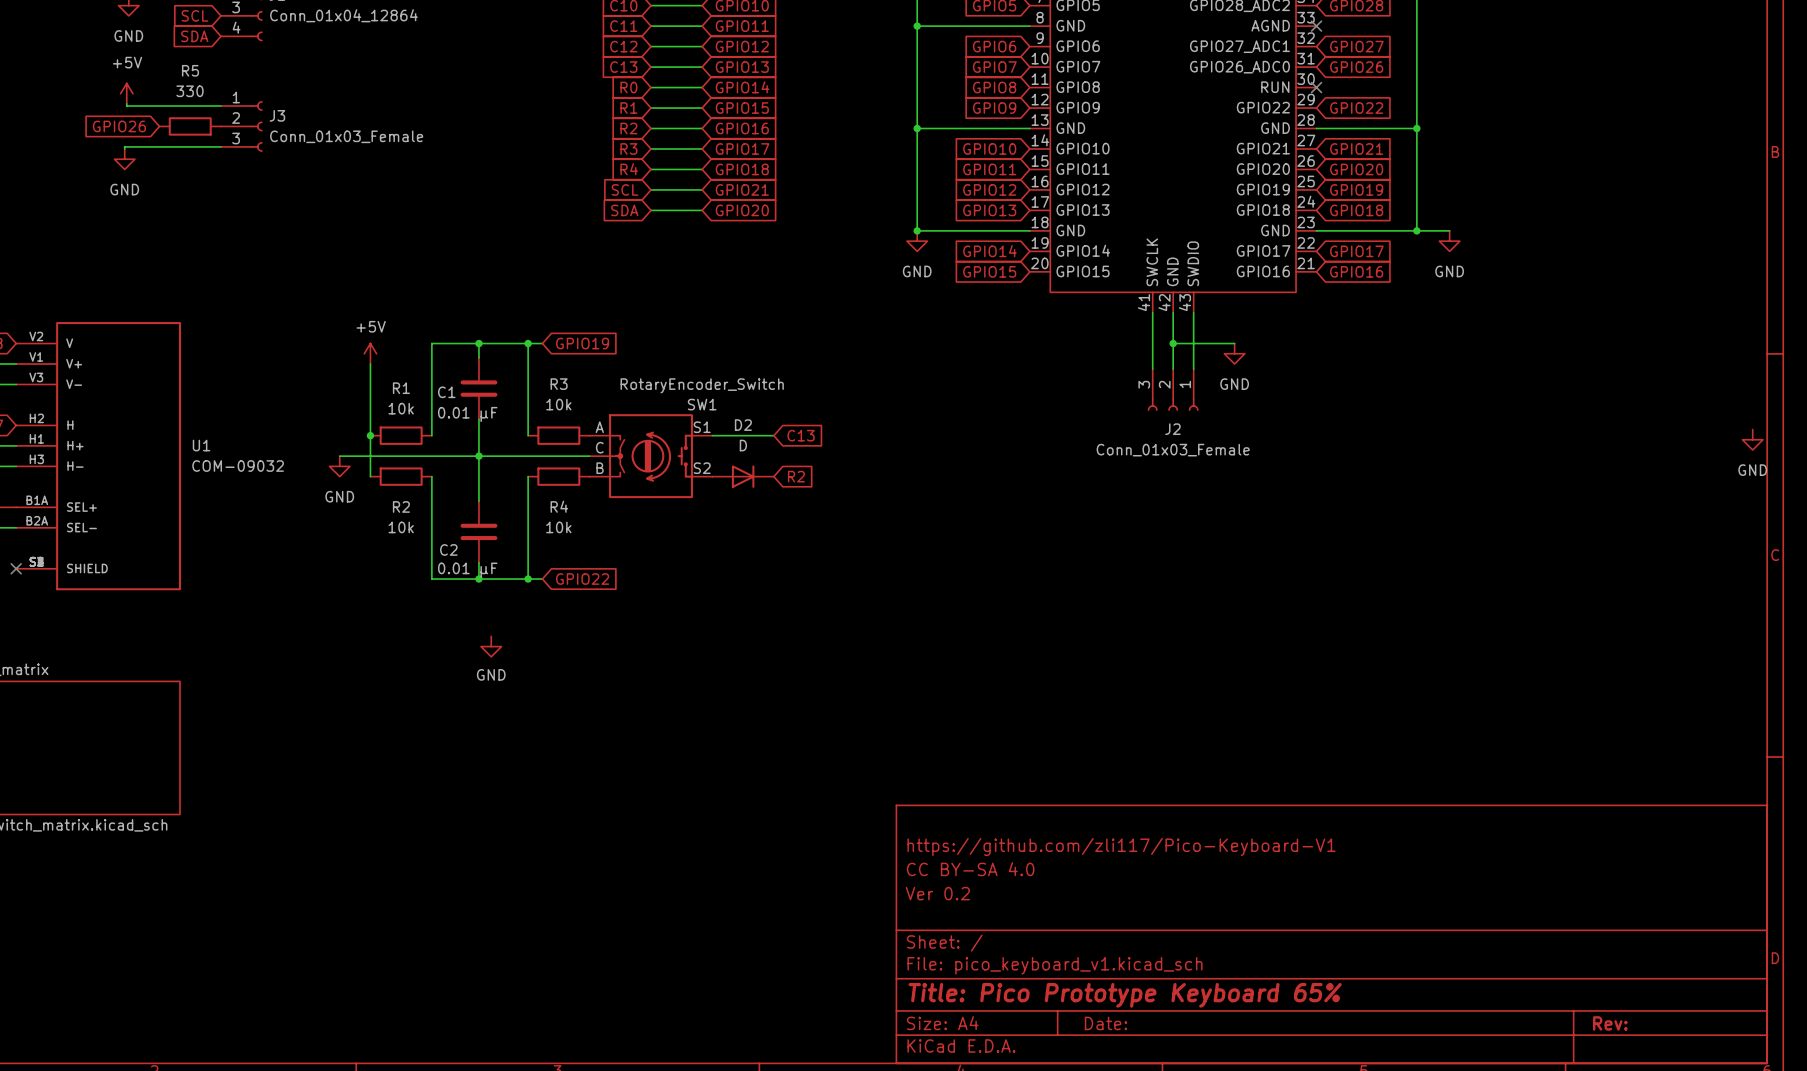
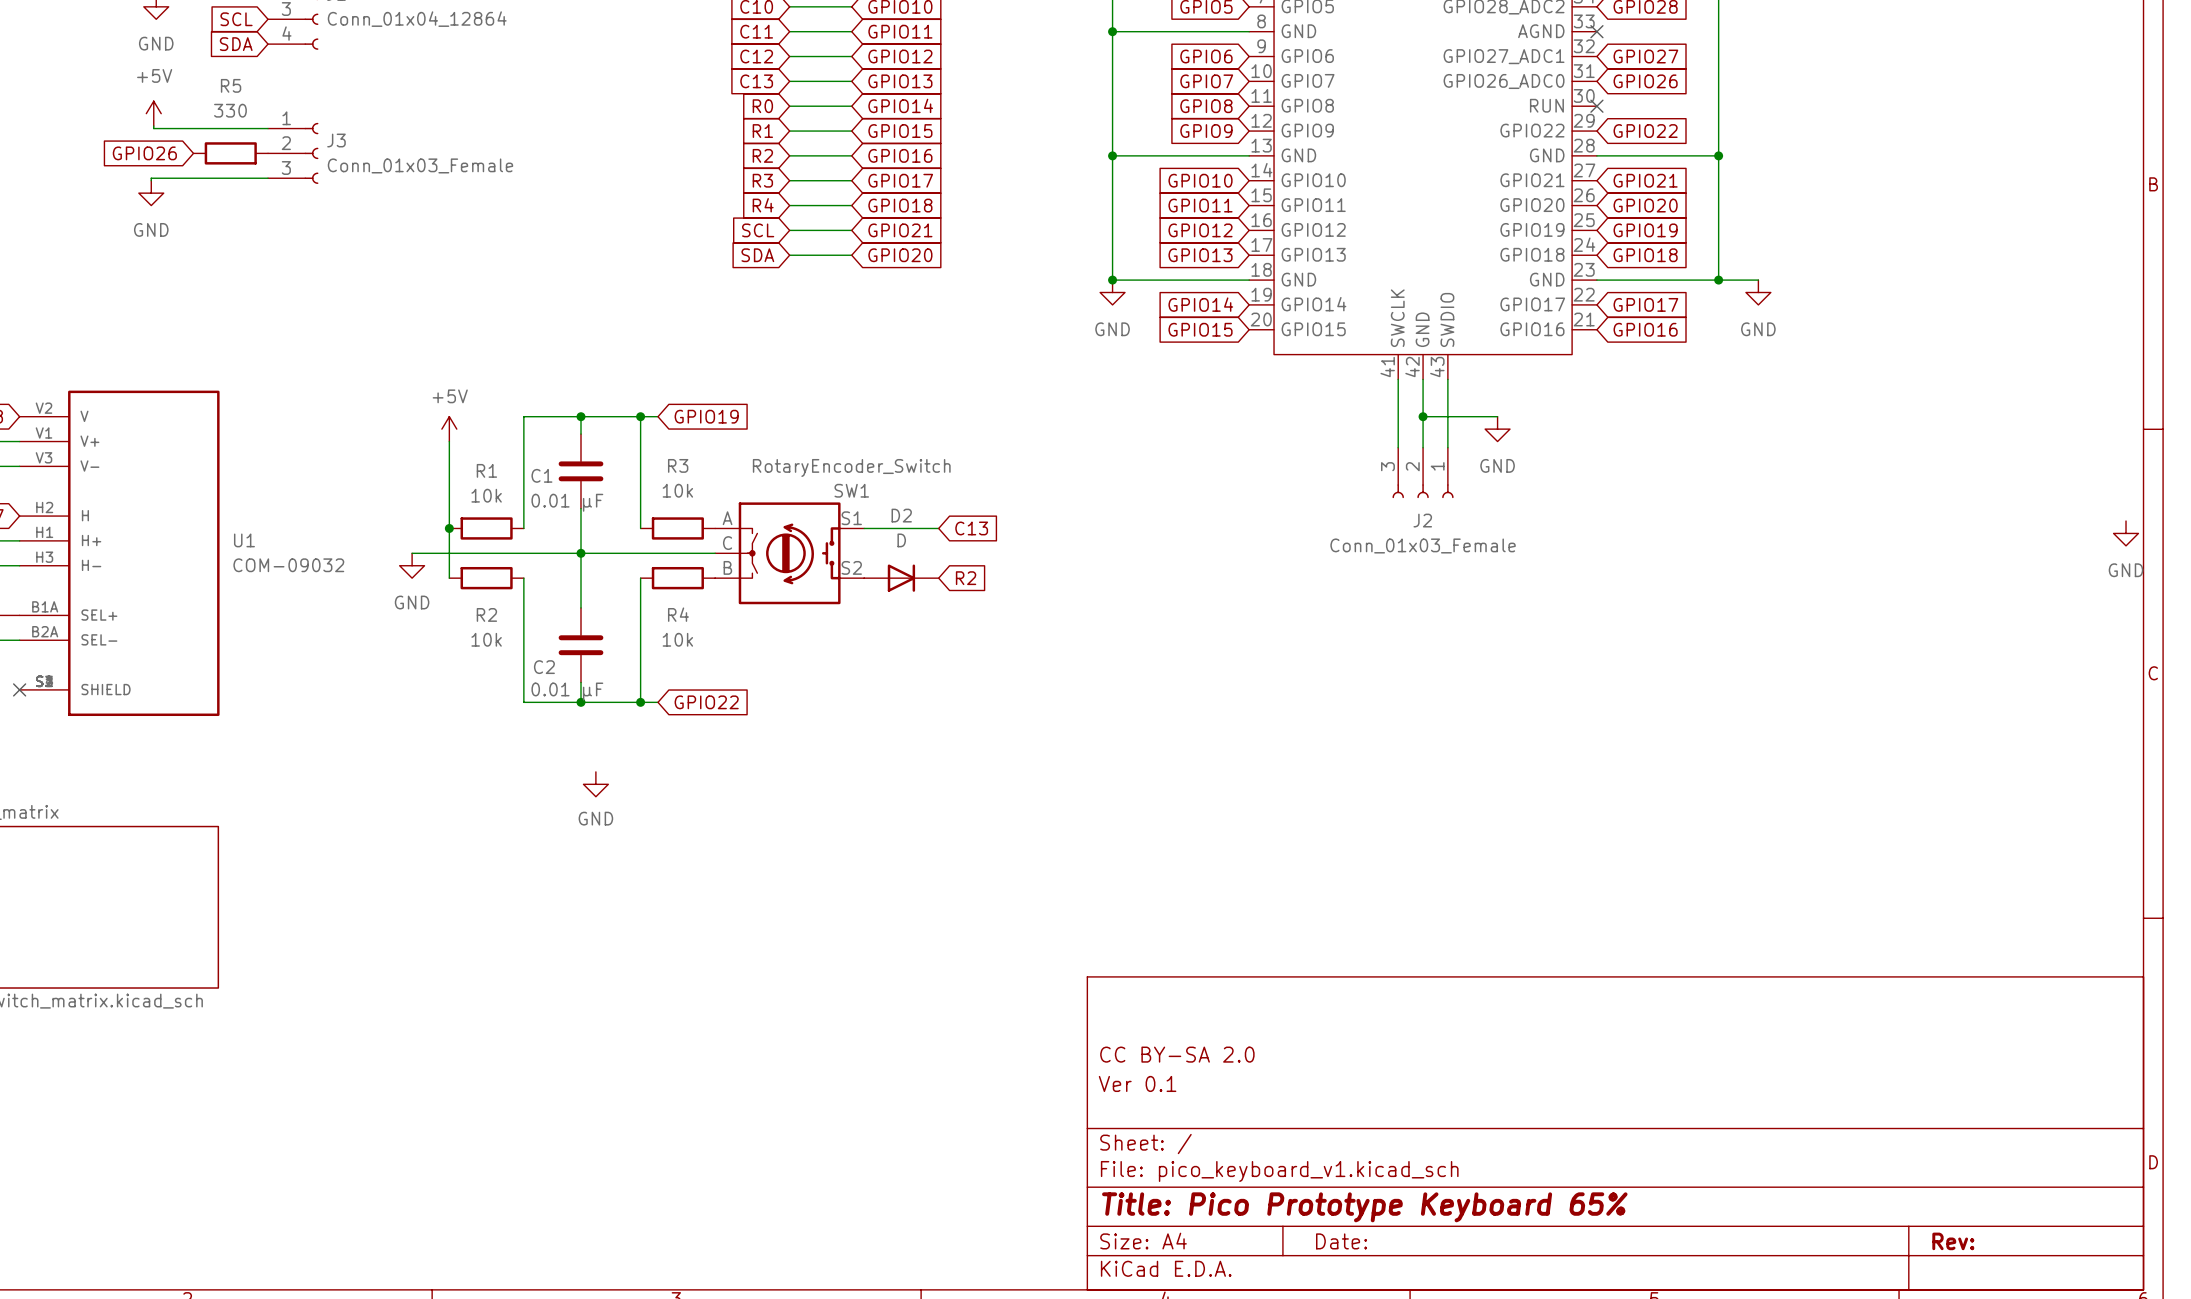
title block: https://github.com/zli117/Pico-Keyboard-V1 (1121, 846) -> none
title block: CC BY-SA 4.0 (970, 869) -> CC BY-SA 2.0 (1177, 1054)
title block: Ver 0.2 (937, 893) -> Ver 0.1 (1137, 1083)

